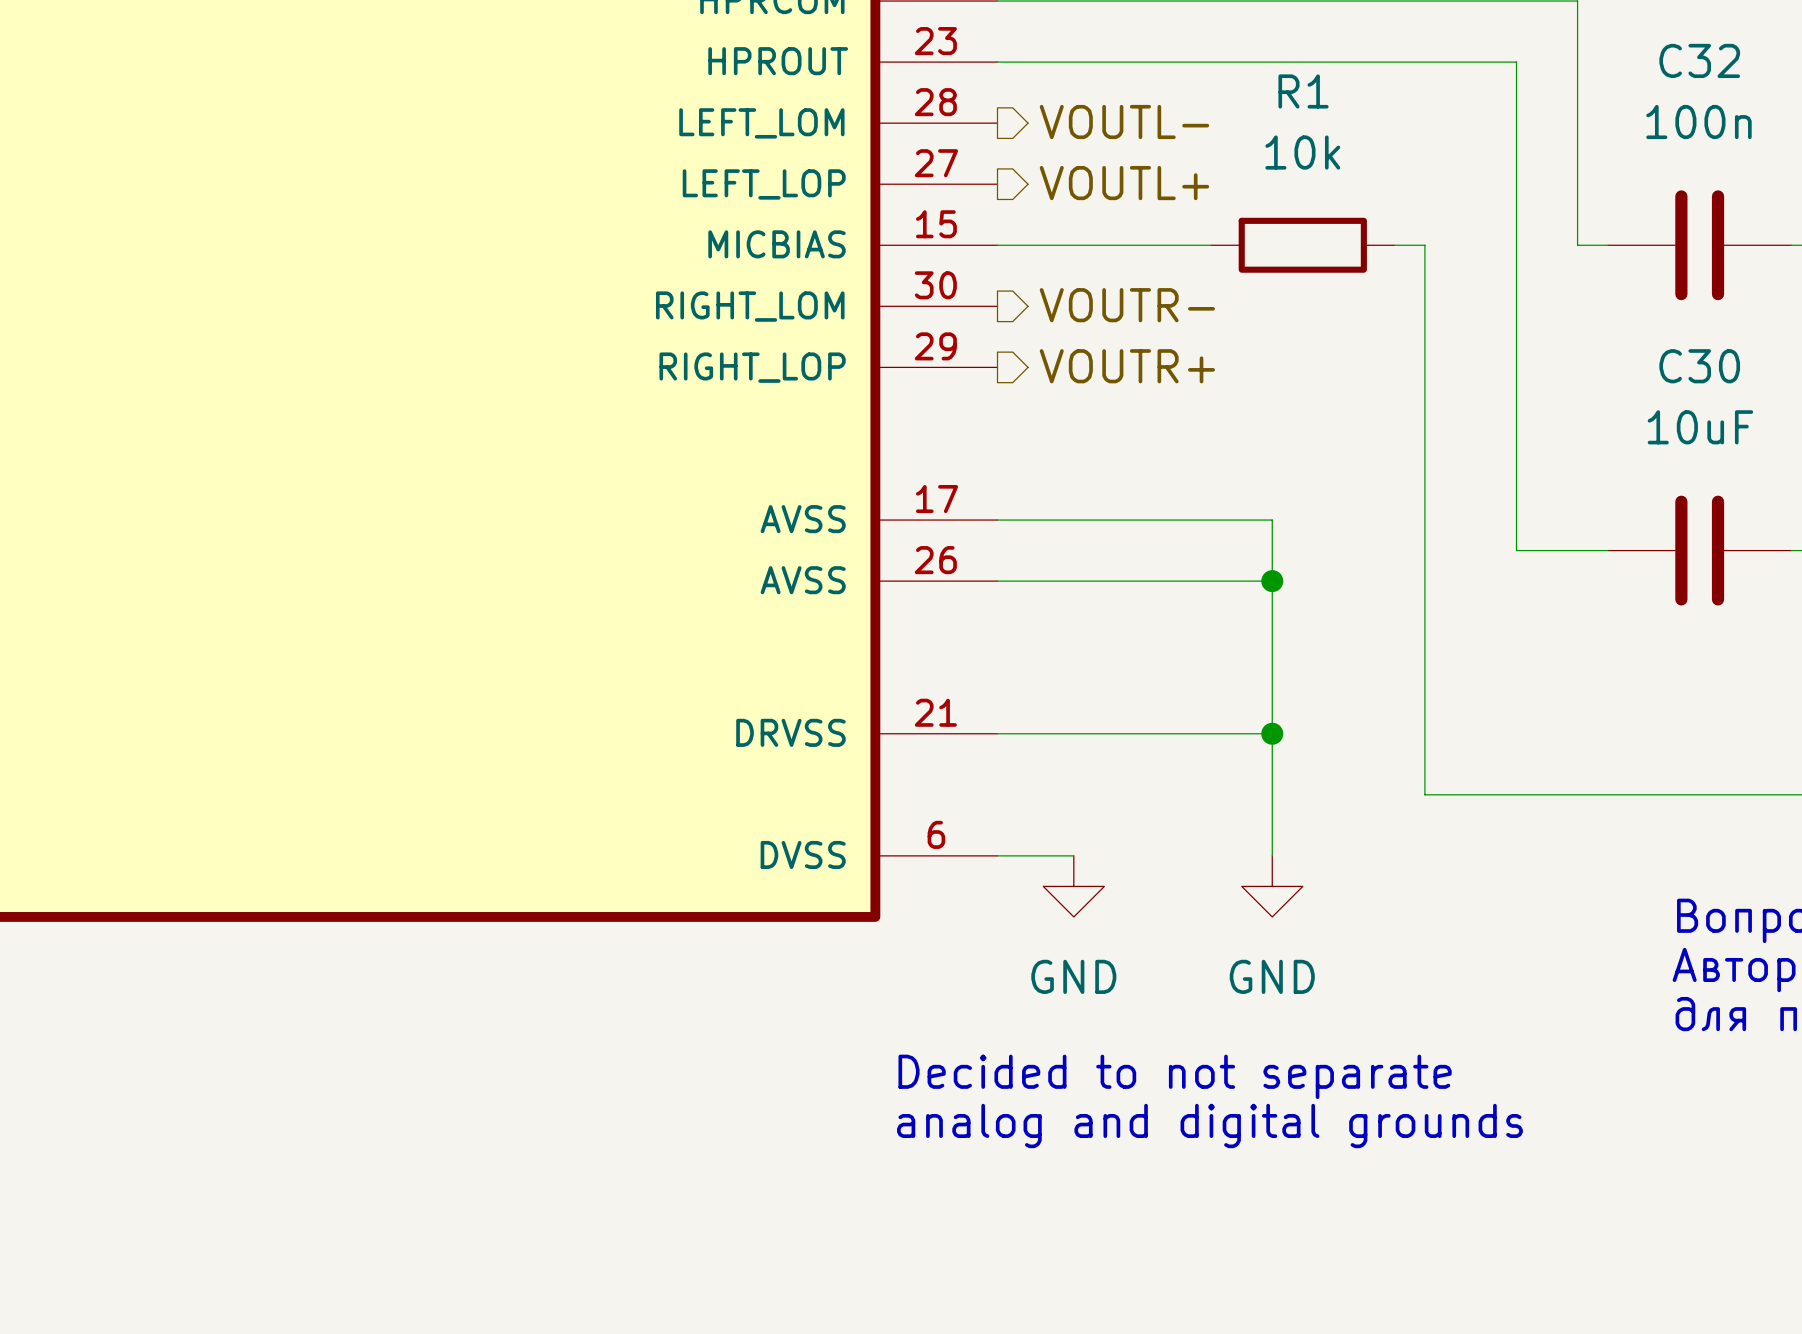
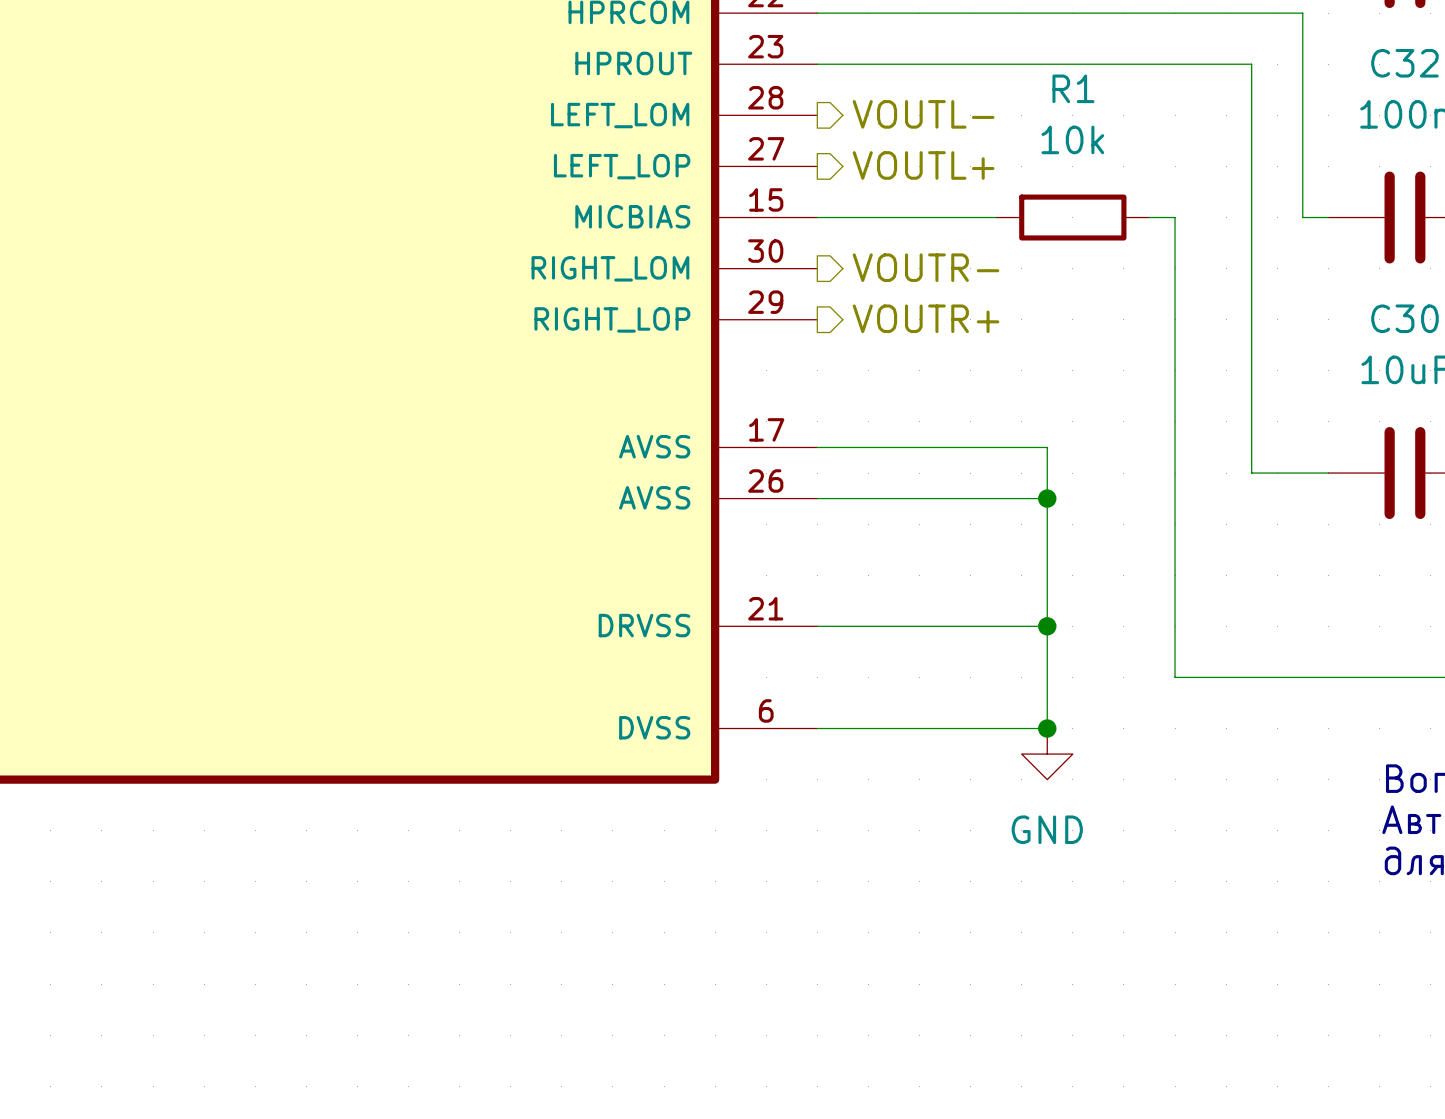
wire: none -> (881, 728) (1047, 728)
junction: none -> (1047, 728)
power symbol: GND (1073, 886) -> none
text: Decided to not separate (1175, 1076) -> none
text: analog and digital grounds (1209, 1126) -> none

